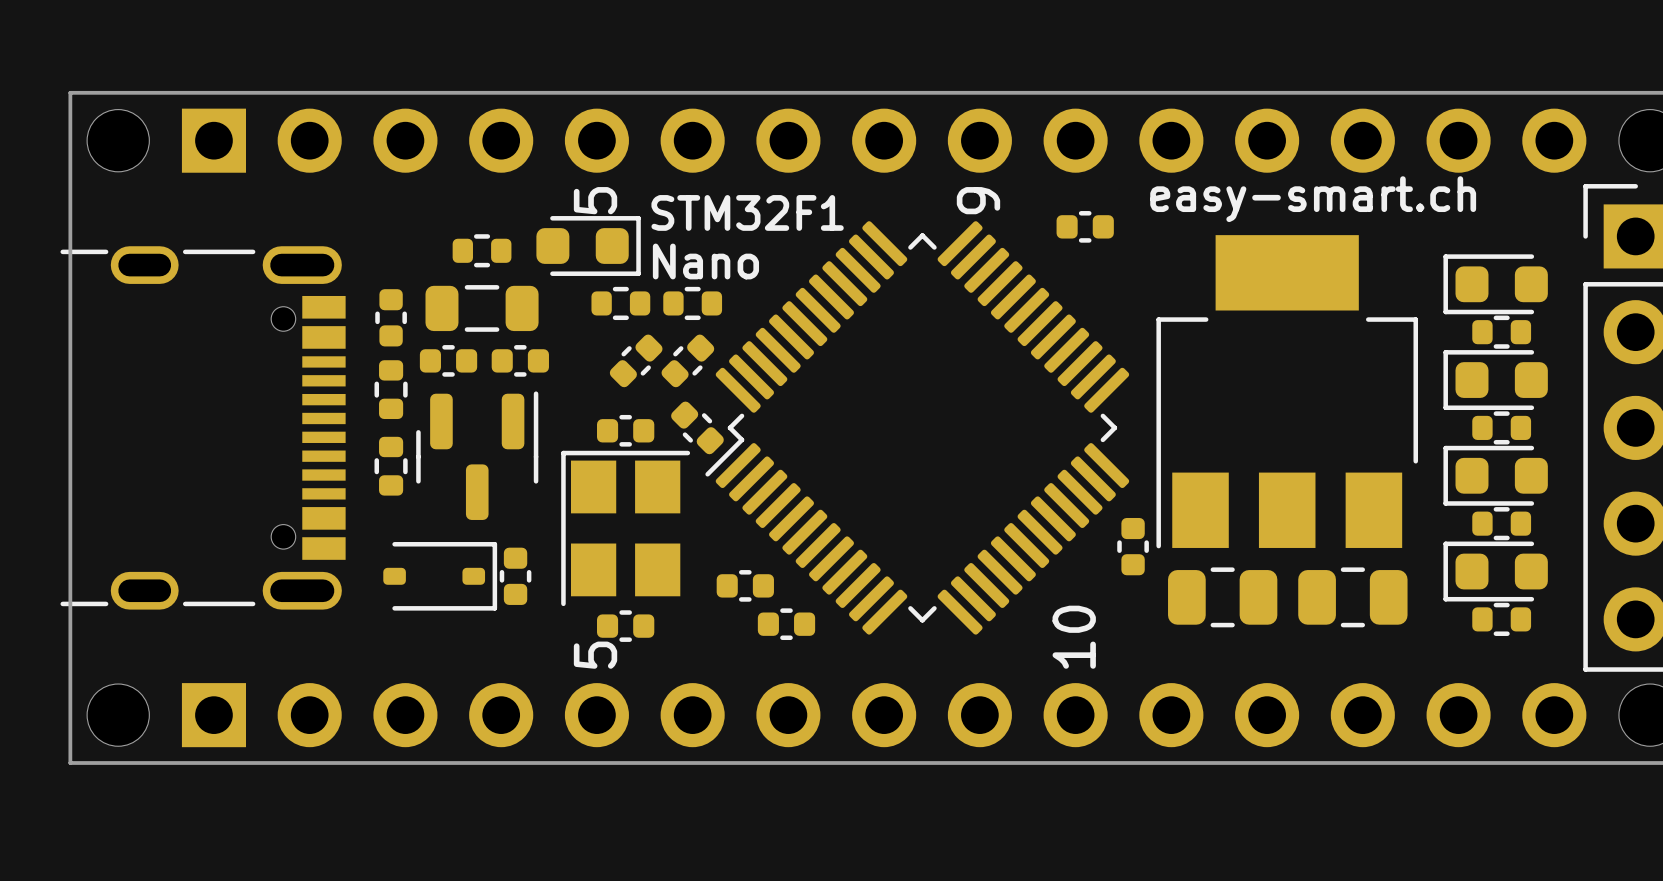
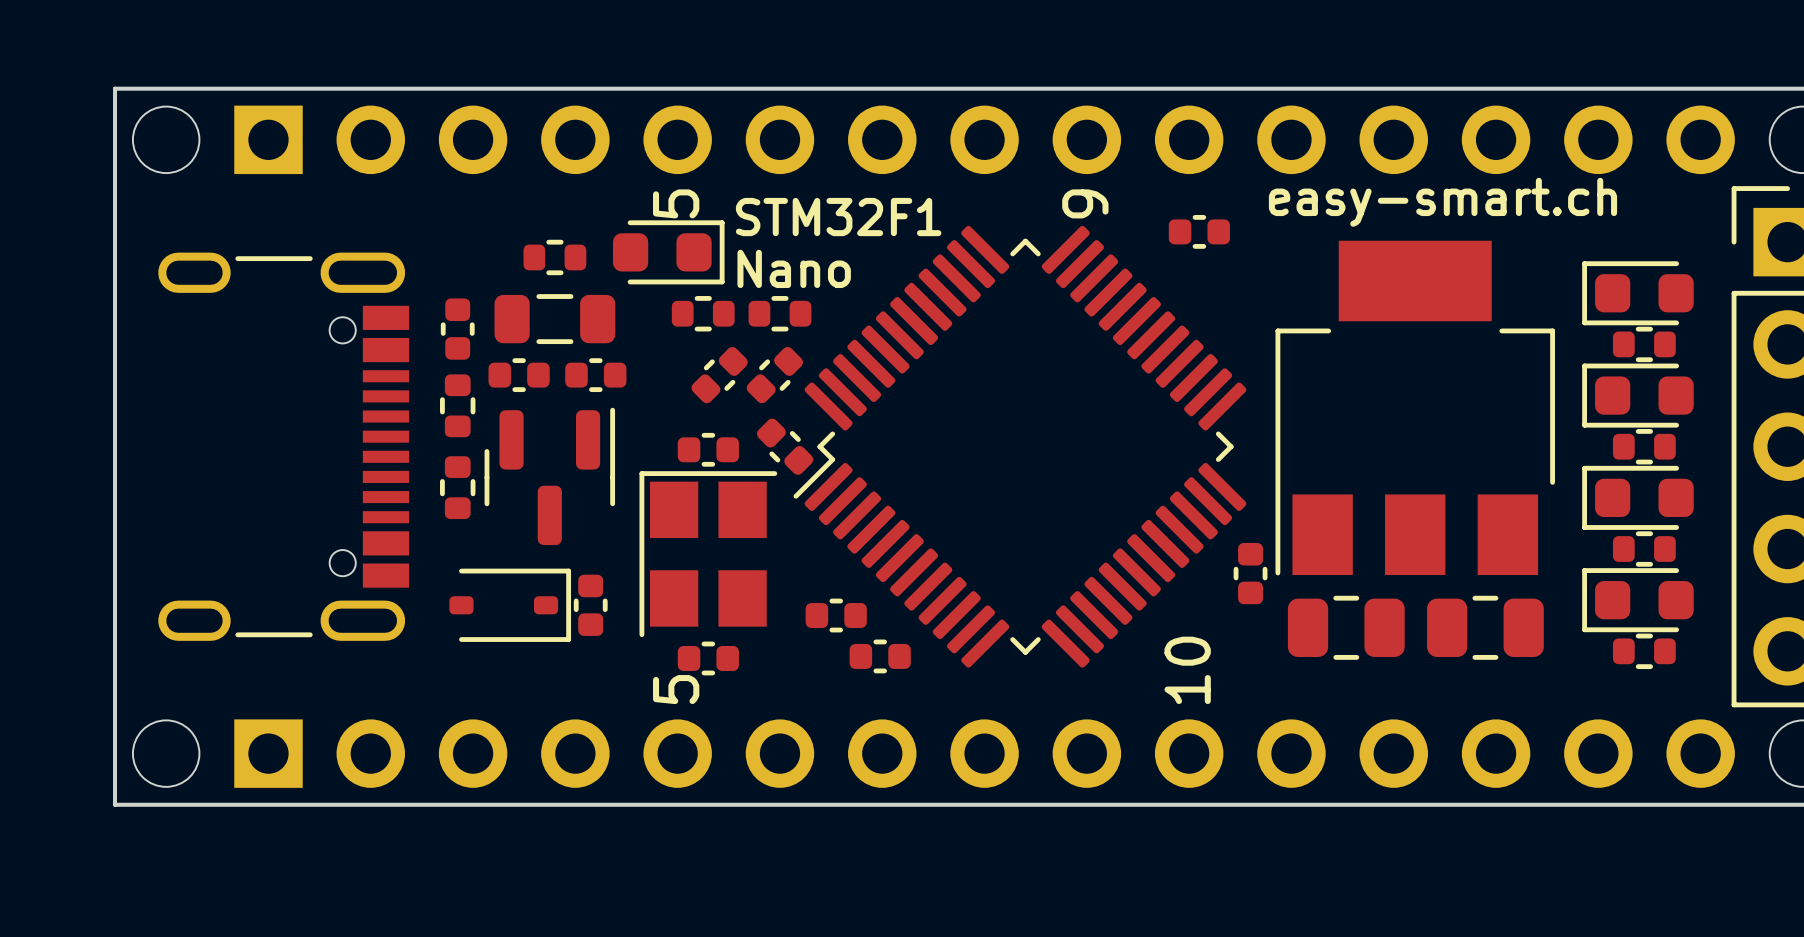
part footprint: [60, 246, 346, 610] -> [158, 252, 410, 641]

